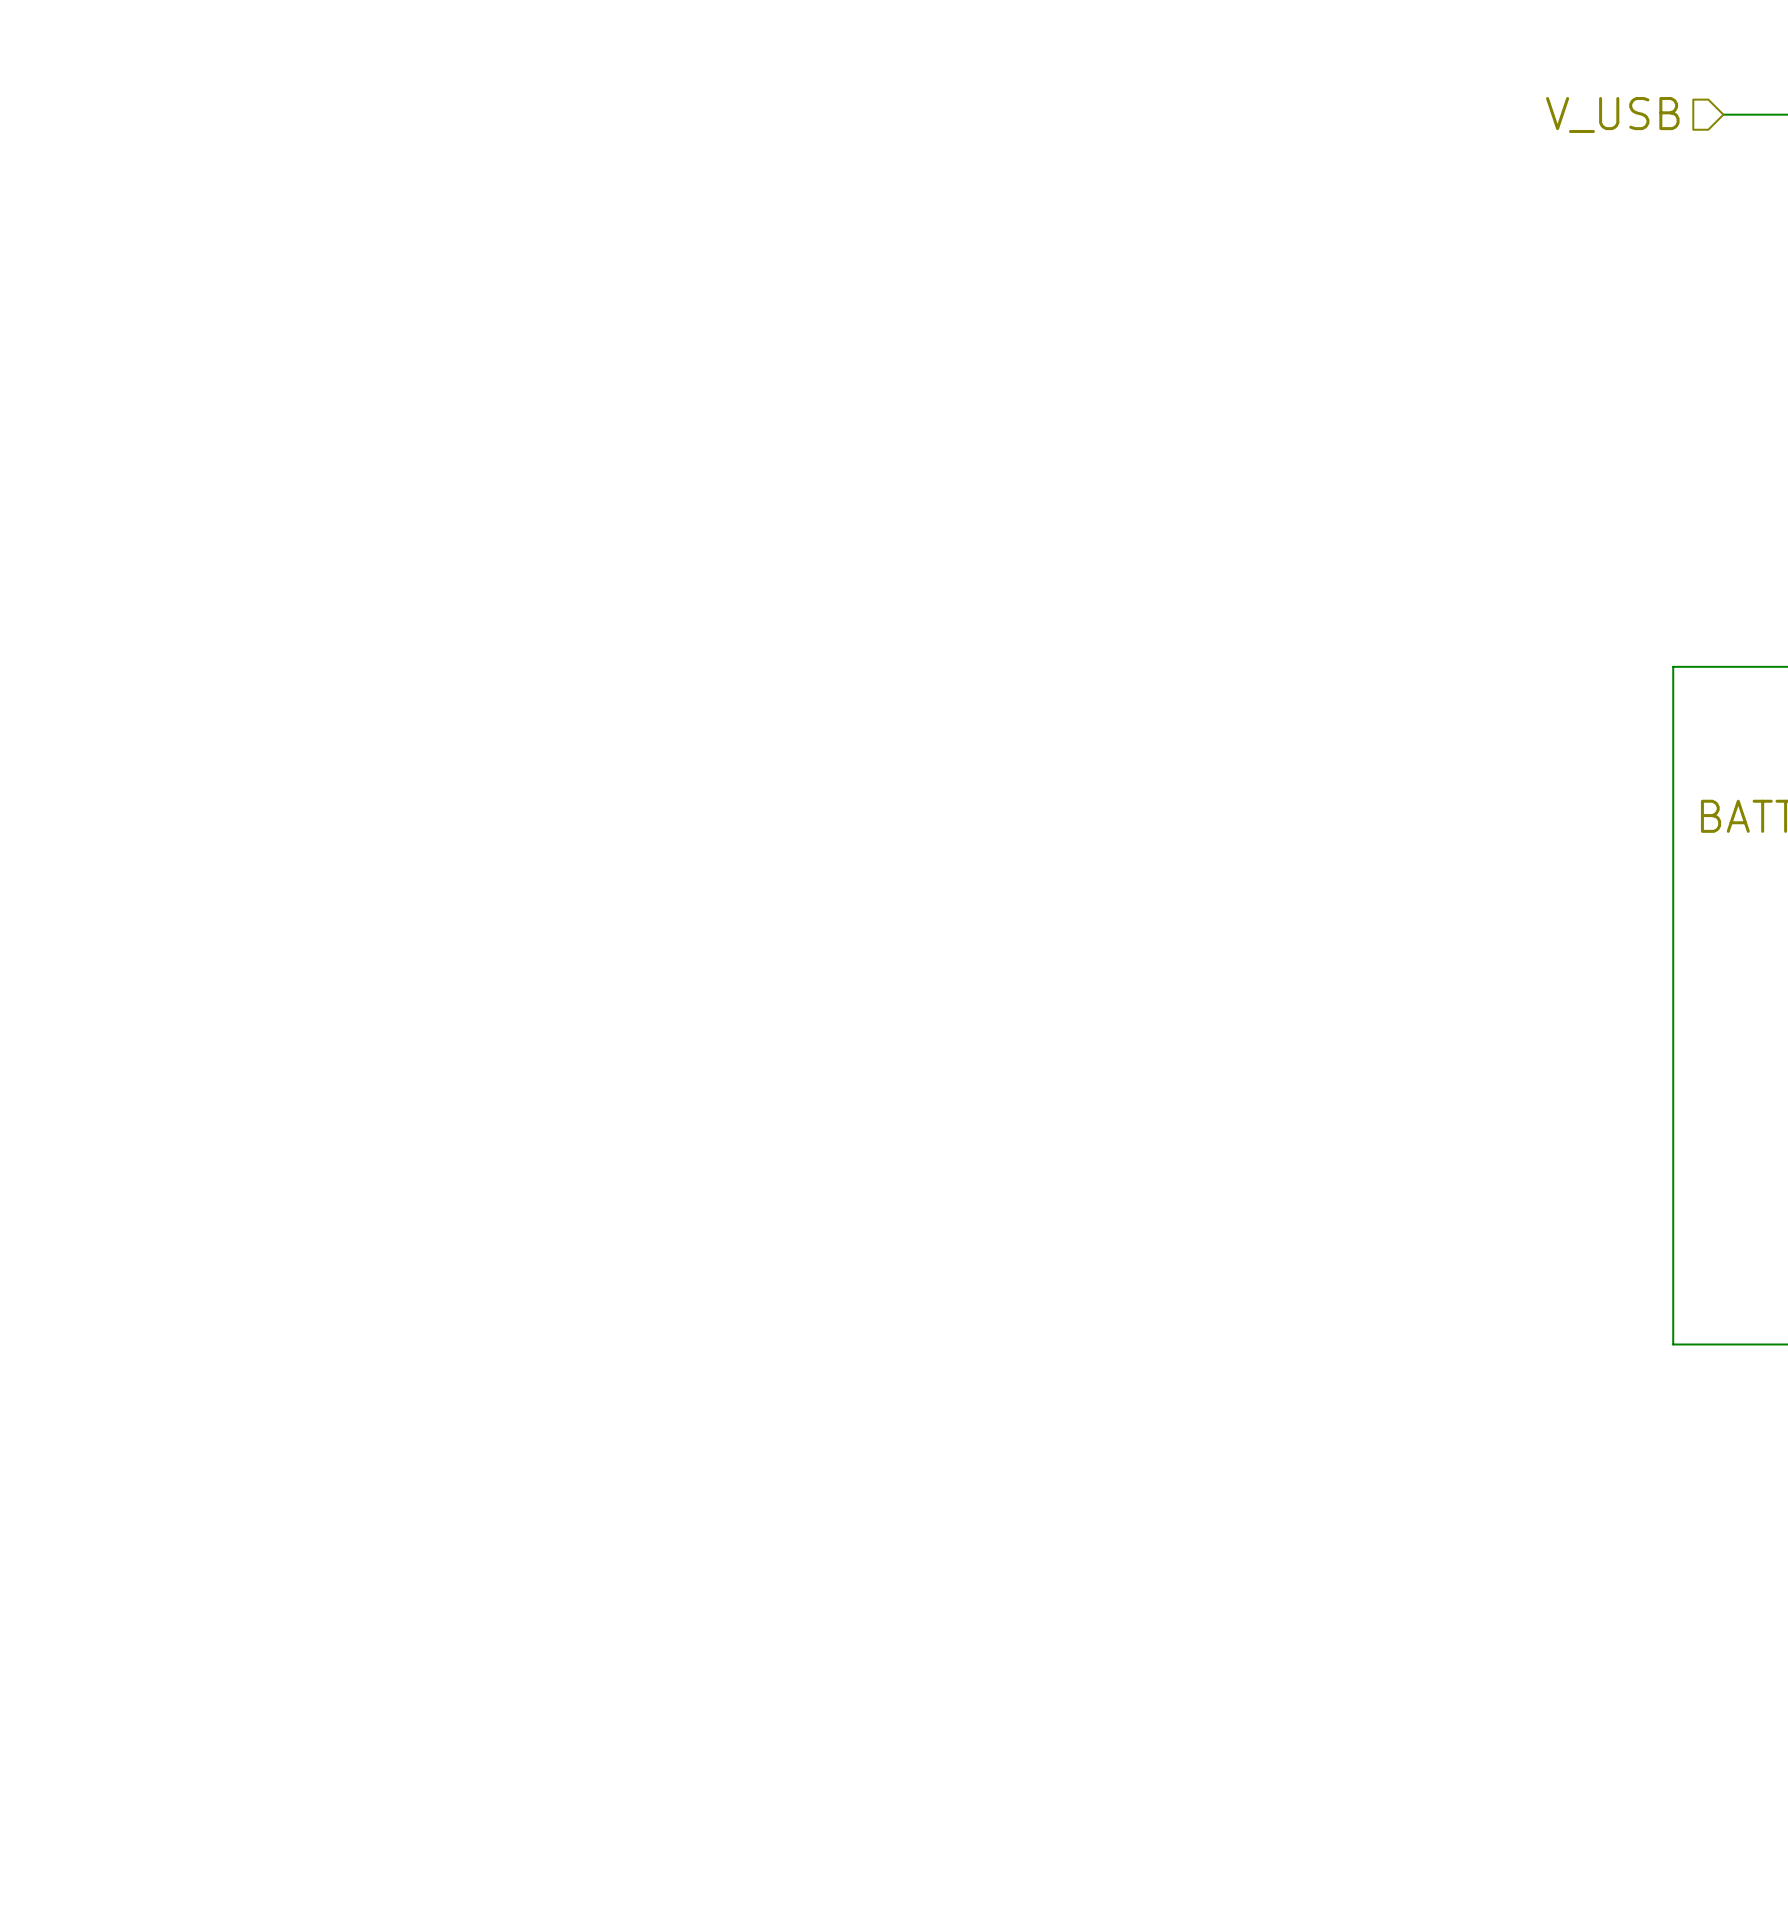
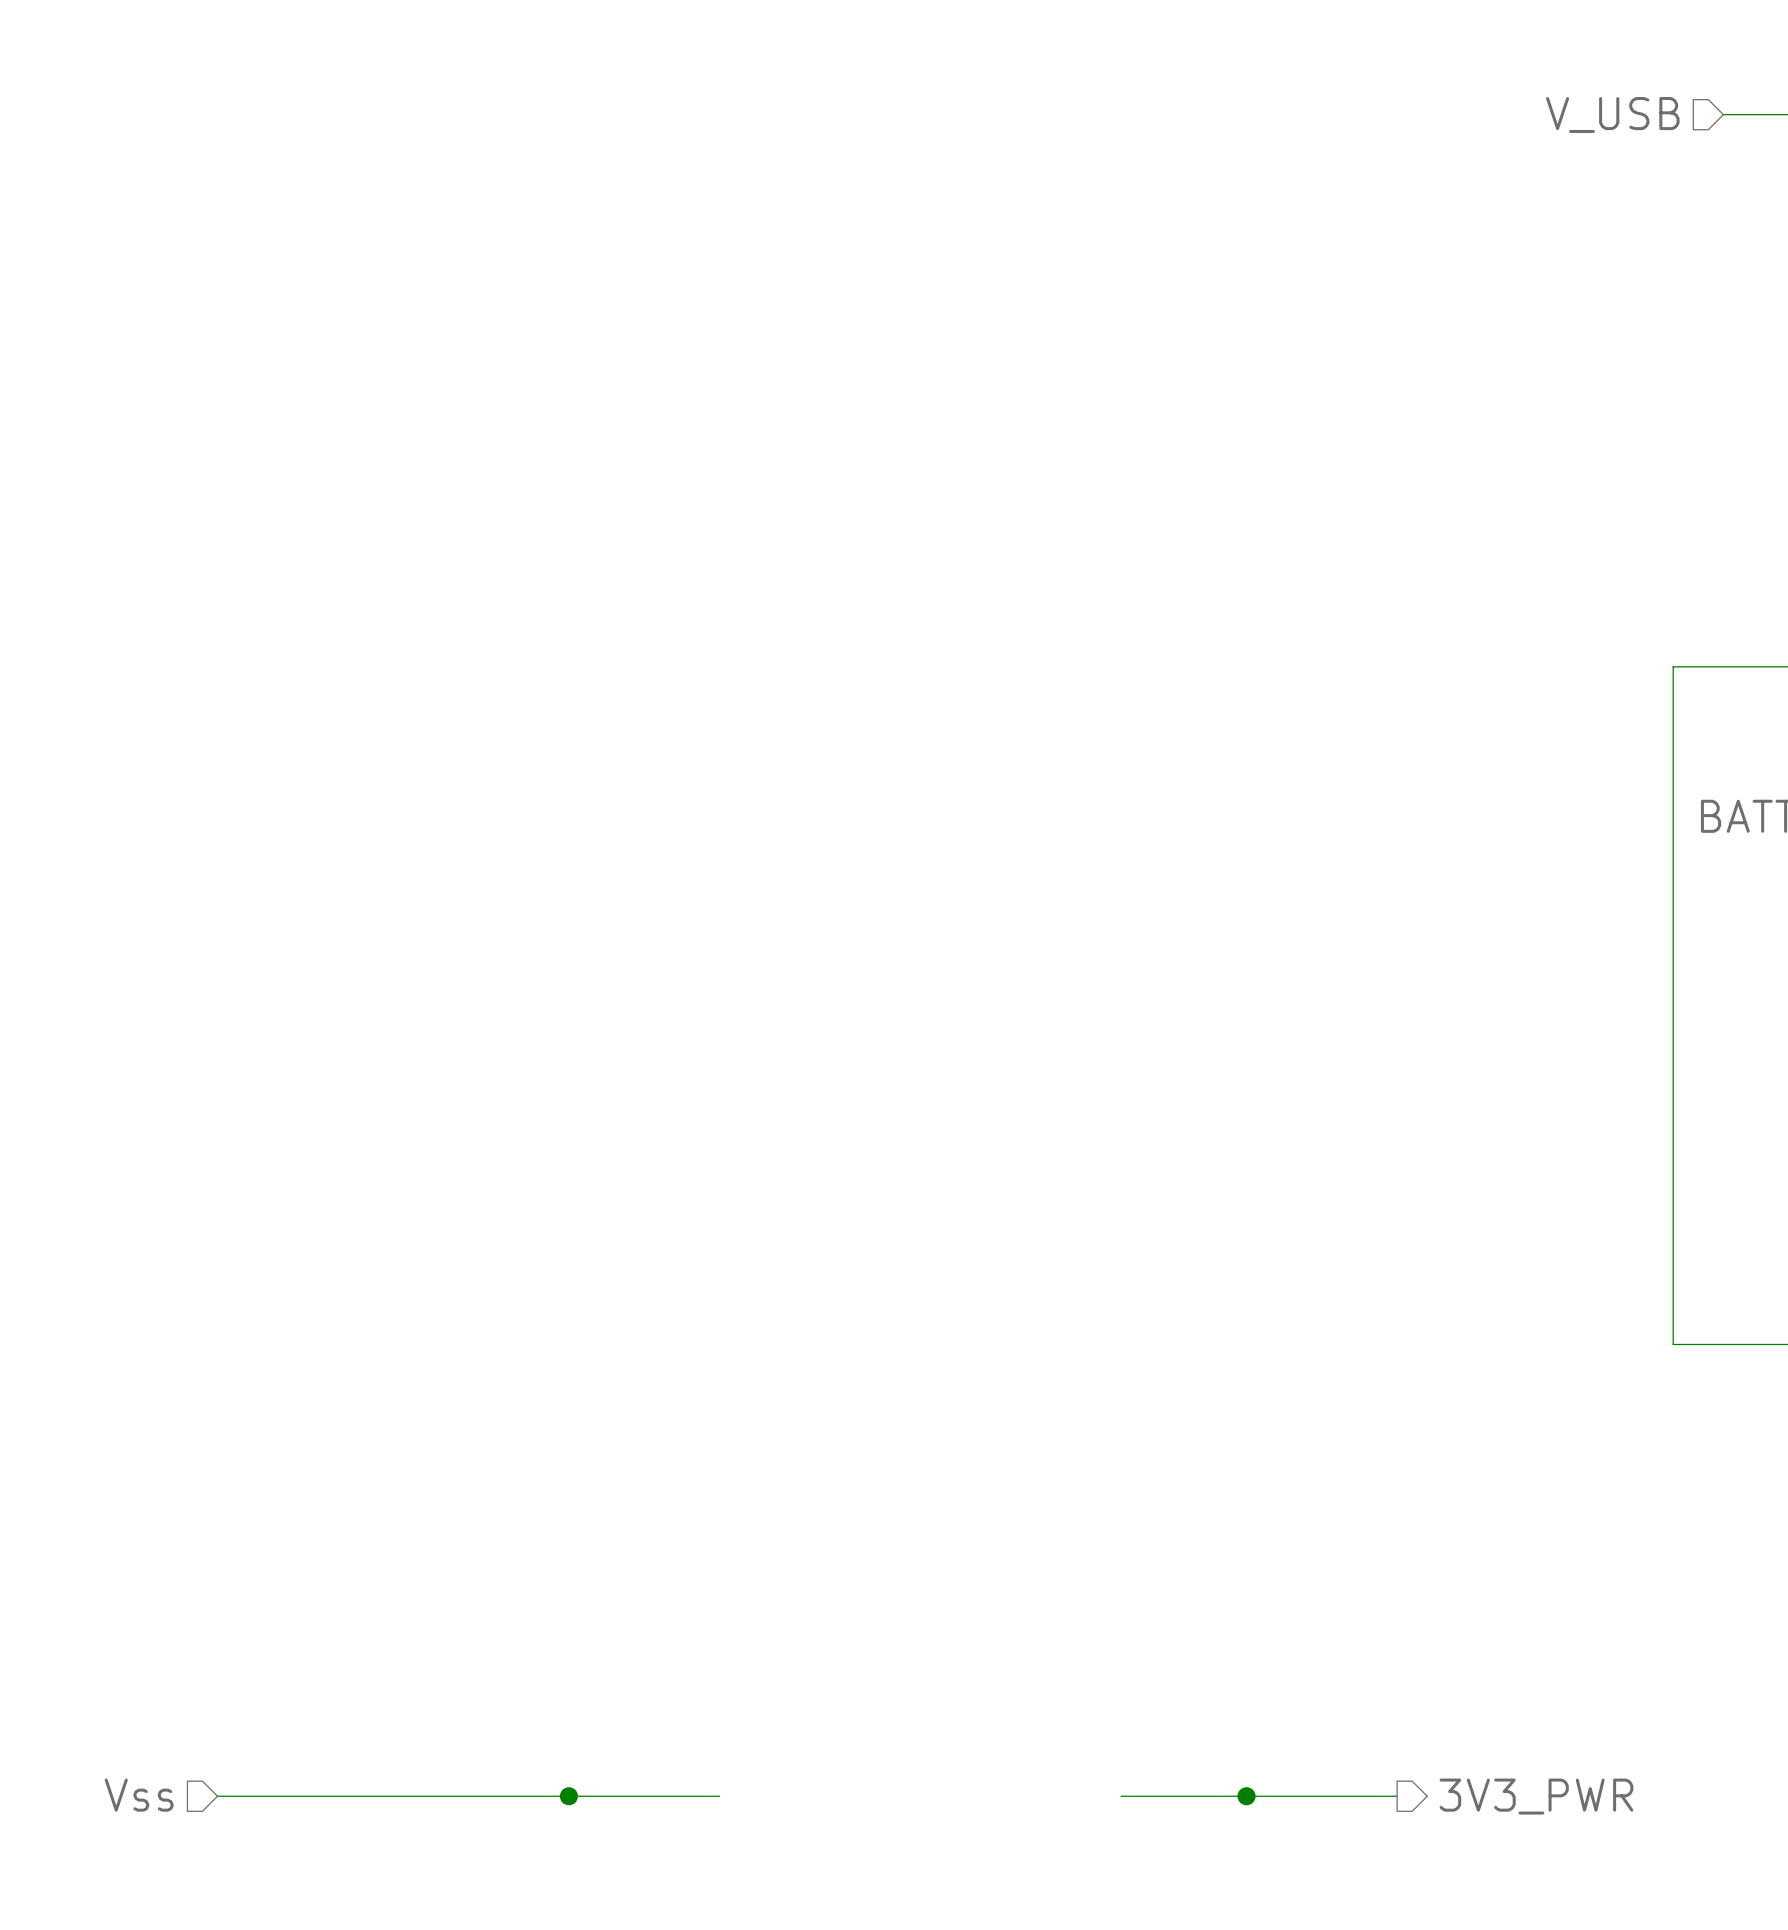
hierarchical label: none -> Vss (139, 1795)
wire: none -> (217, 1796) (719, 1796)
junction: none -> (568, 1796)
wire: none -> (1121, 1796) (1397, 1796)
junction: none -> (1246, 1796)
hierarchical label: none -> 3V3_PWR (1536, 1796)

